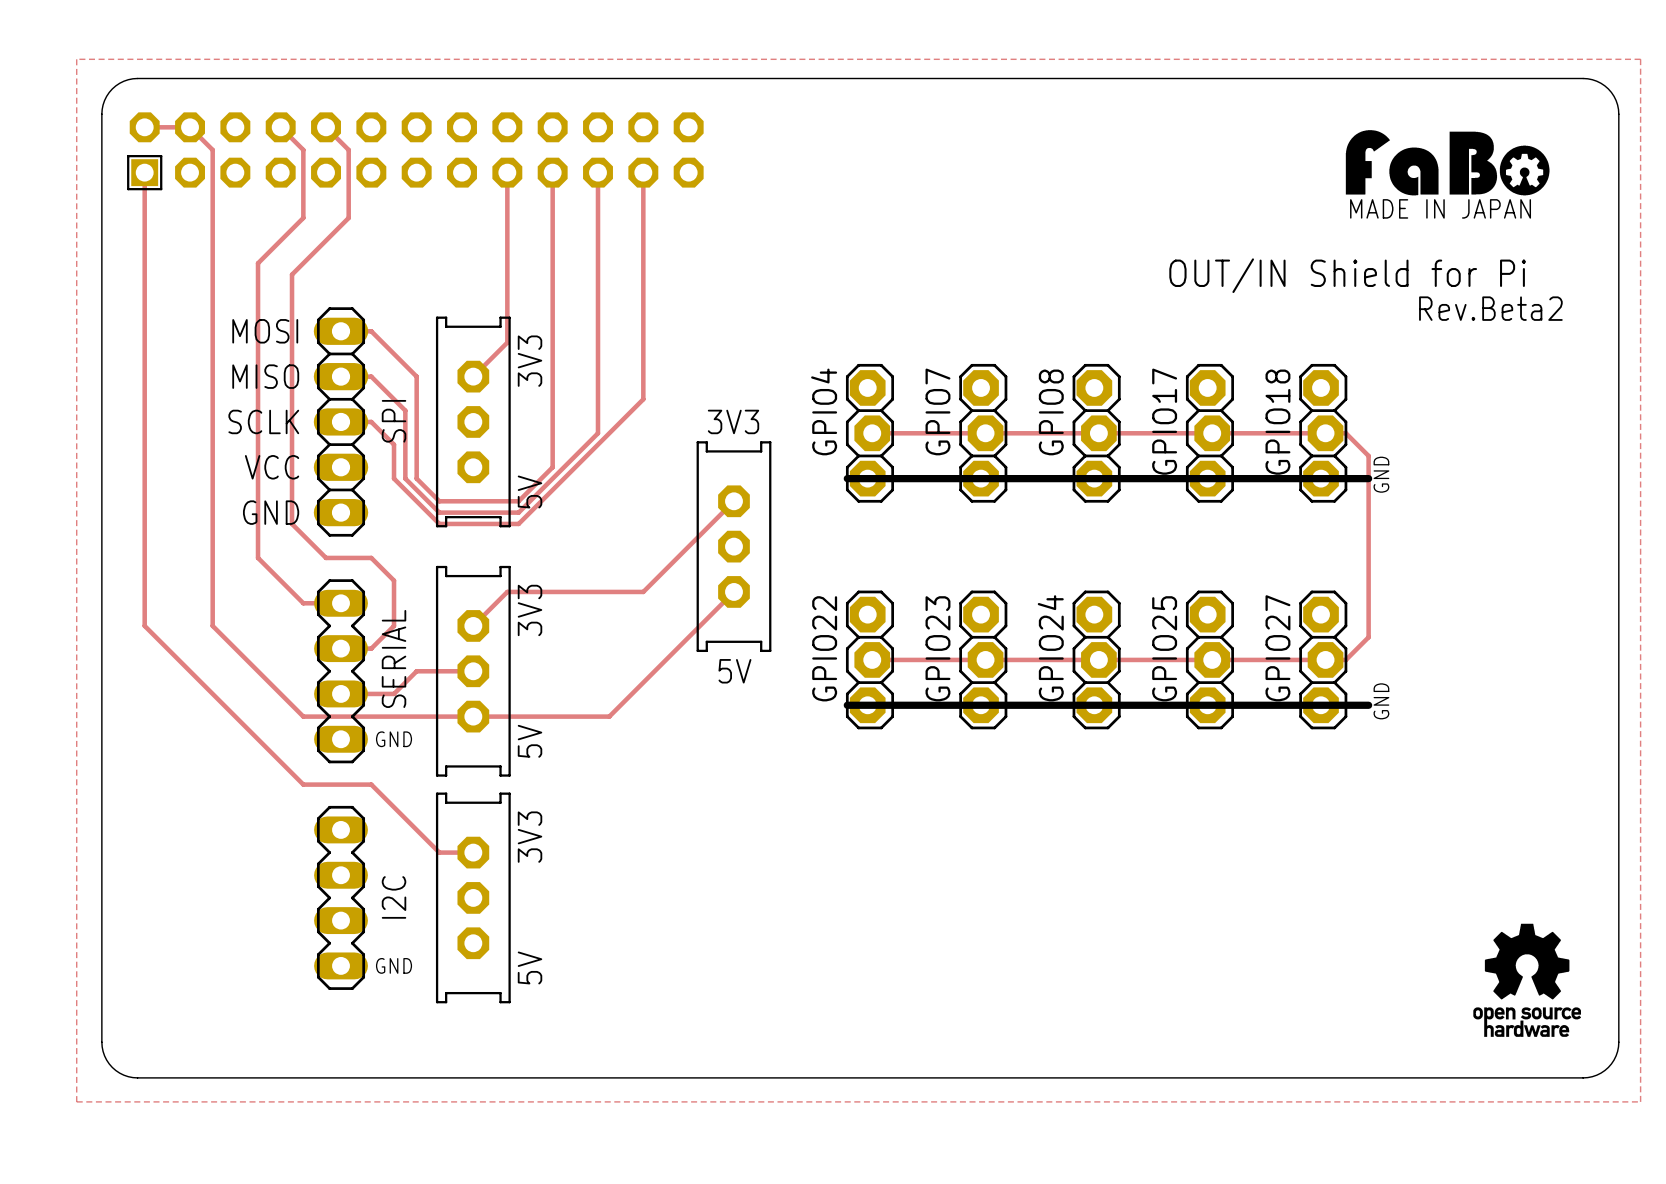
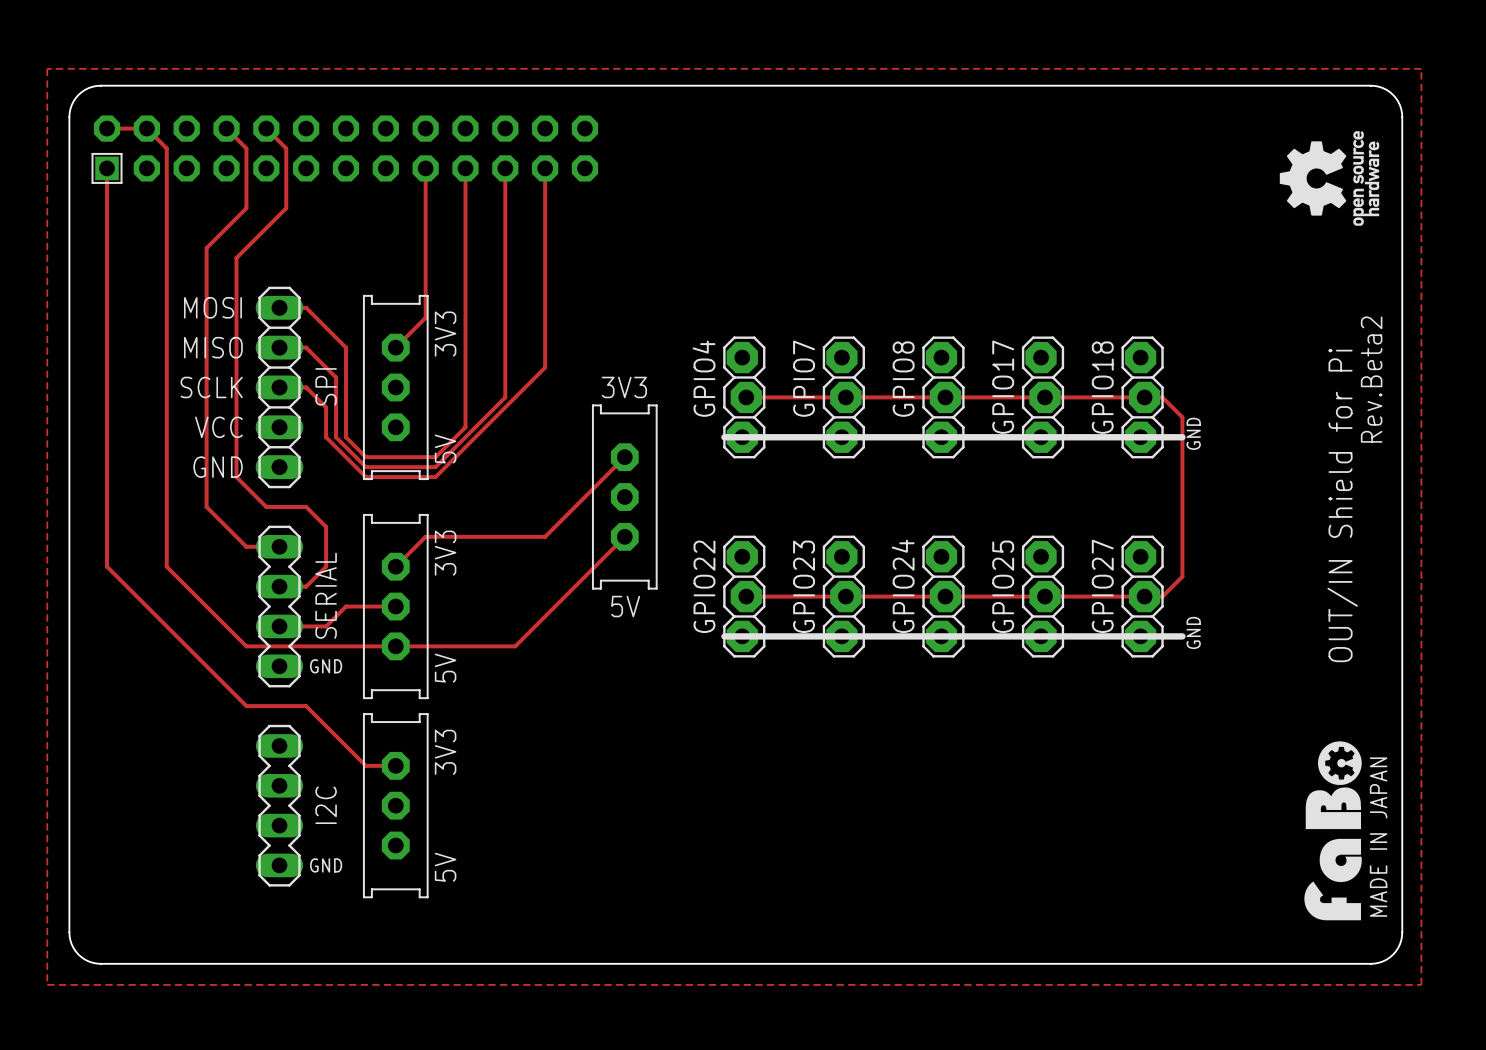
drawing: [1345, 130, 1550, 196] -> none
drawing: none -> [1279, 131, 1380, 226]
text: MADE IN JAPAN (1440, 208) -> none
text: OUT/IN Shield for Pi (1347, 275) -> none
text rotation: 0° (1490, 308) -> 90° counterclockwise (1371, 379)
text: none -> OUT/IN Shield for Pi (1342, 505)
drawing: none -> [1304, 741, 1362, 921]
drawing: [1473, 923, 1581, 1037] -> none
text: none -> MADE IN JAPAN (1378, 837)

